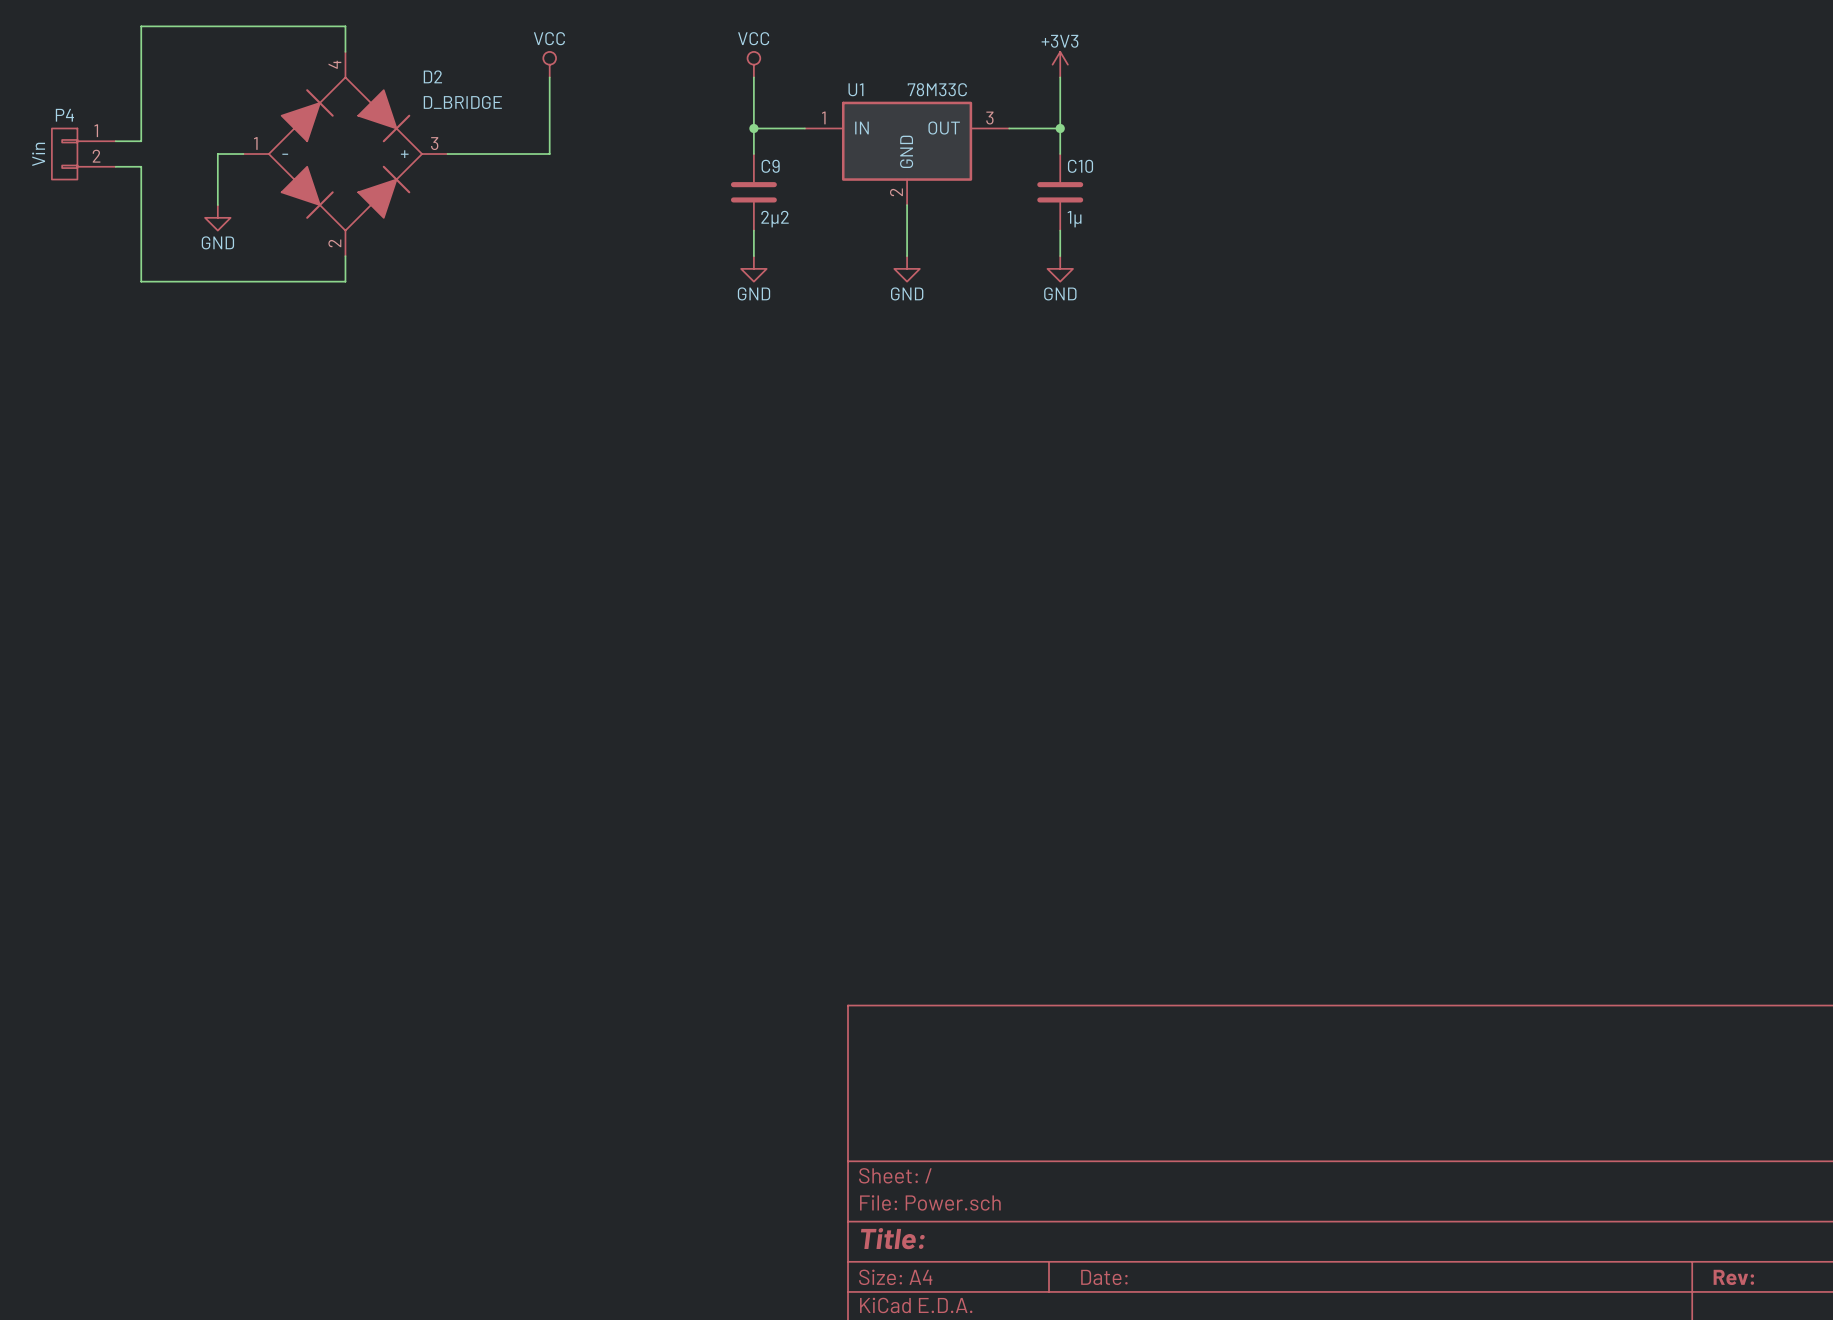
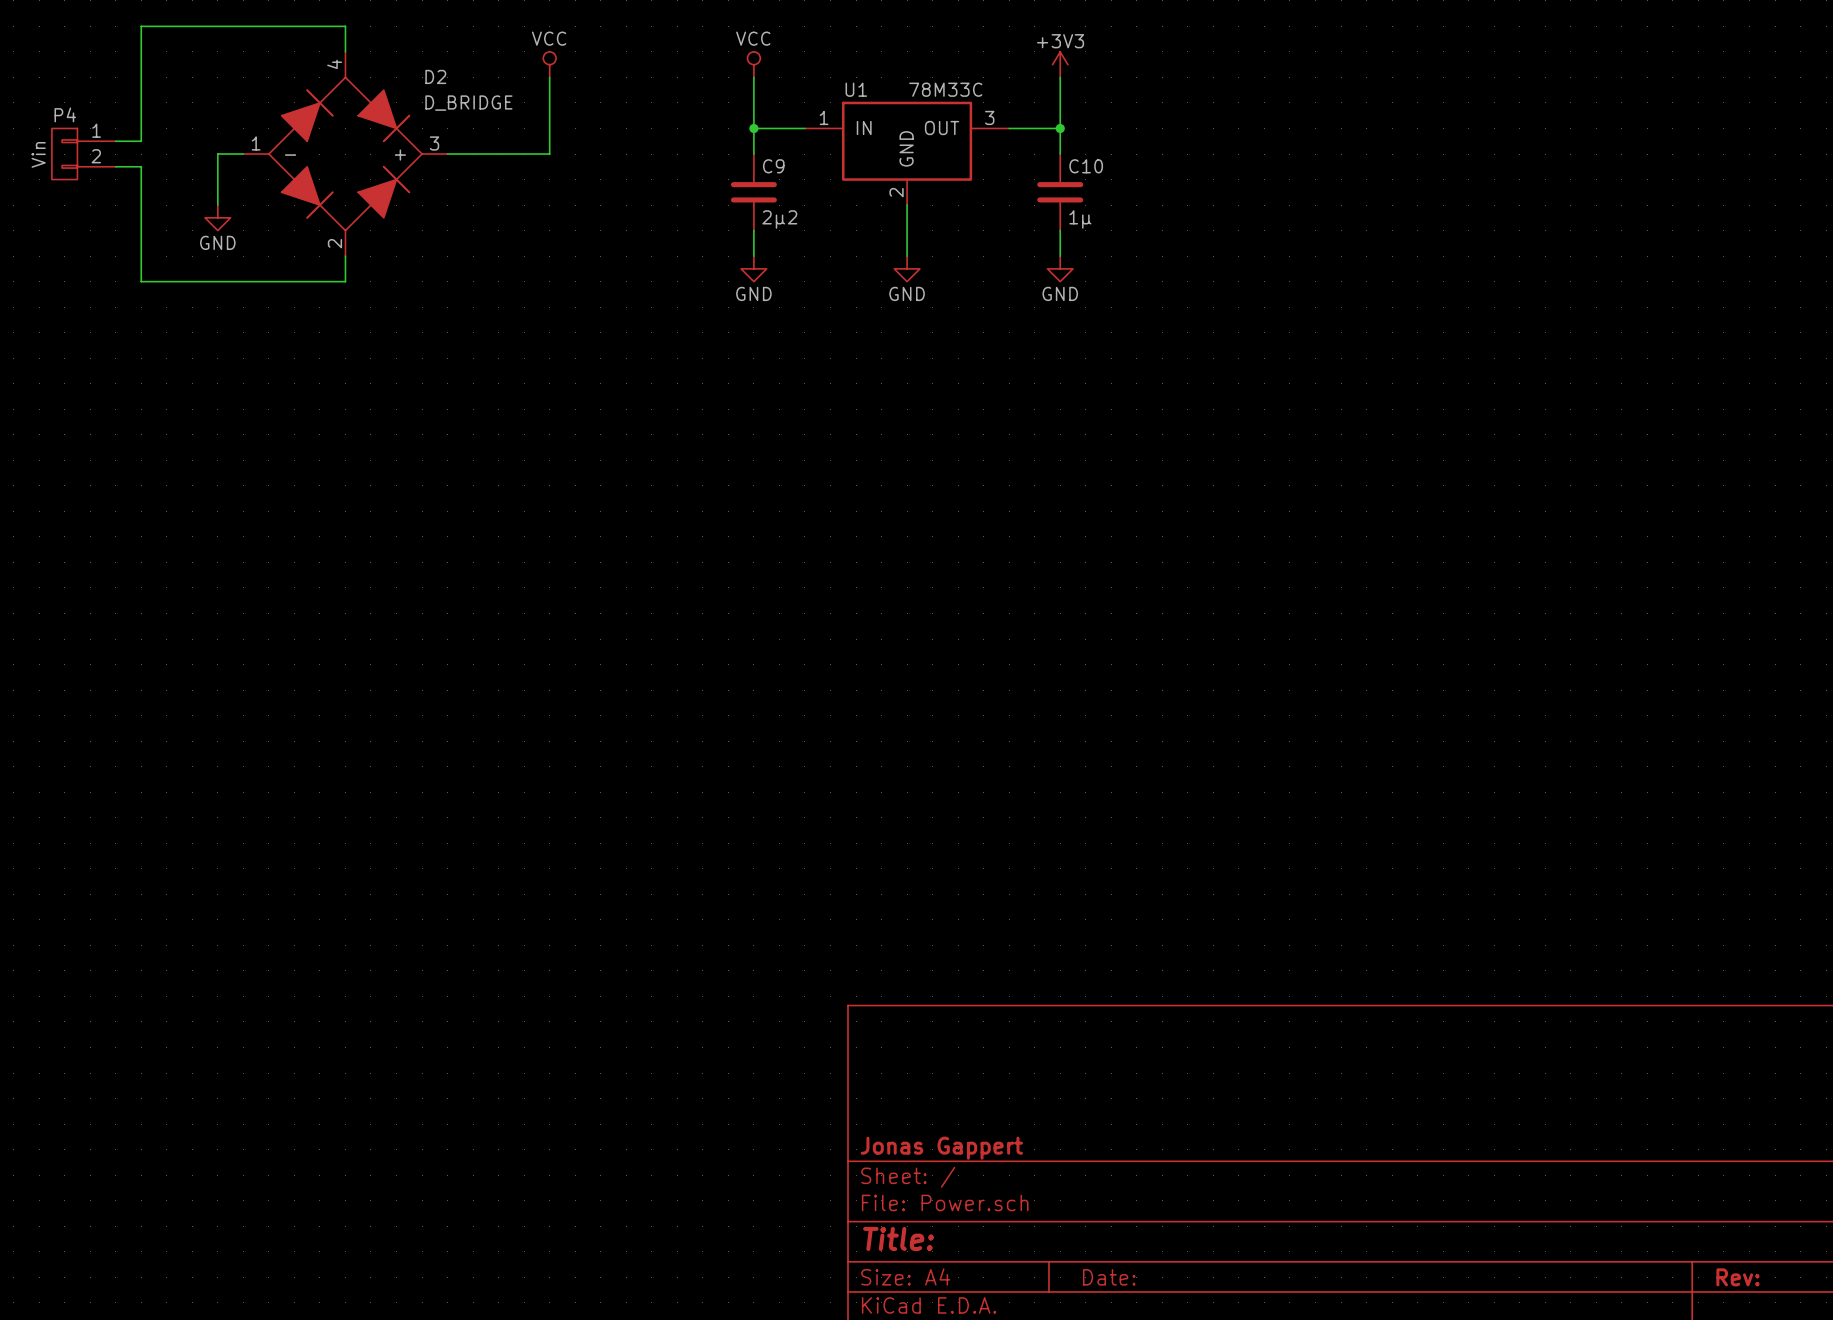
title block: none -> Jonas Gappert (941, 1148)

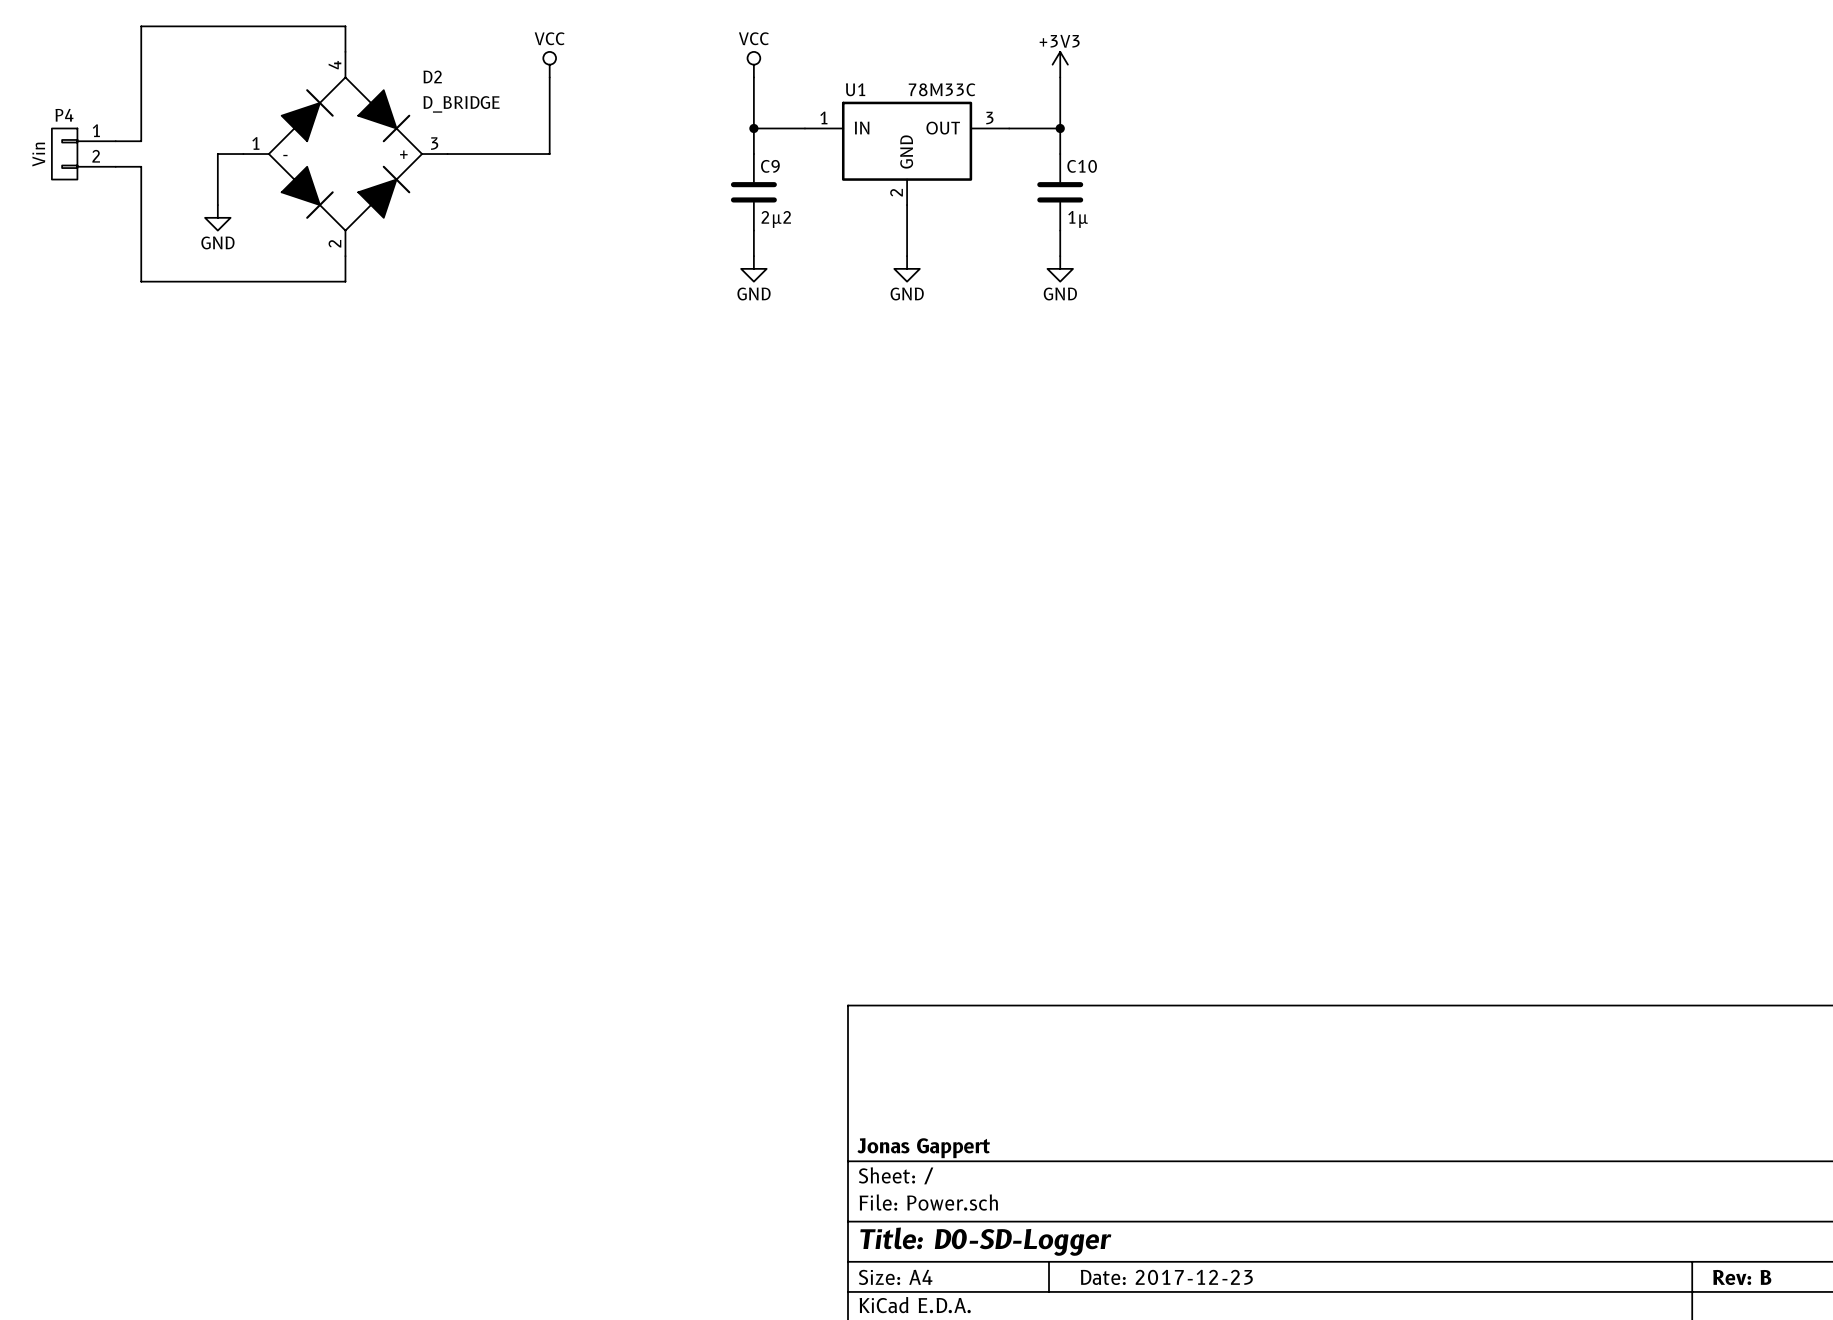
title block: Title: (898, 1238) -> Title: D0-SD-Logger (985, 1241)
title block: Date: (1109, 1277) -> Date: 2017-12-23 (1166, 1277)
title block: Rev: (1737, 1277) -> Rev: B (1742, 1277)

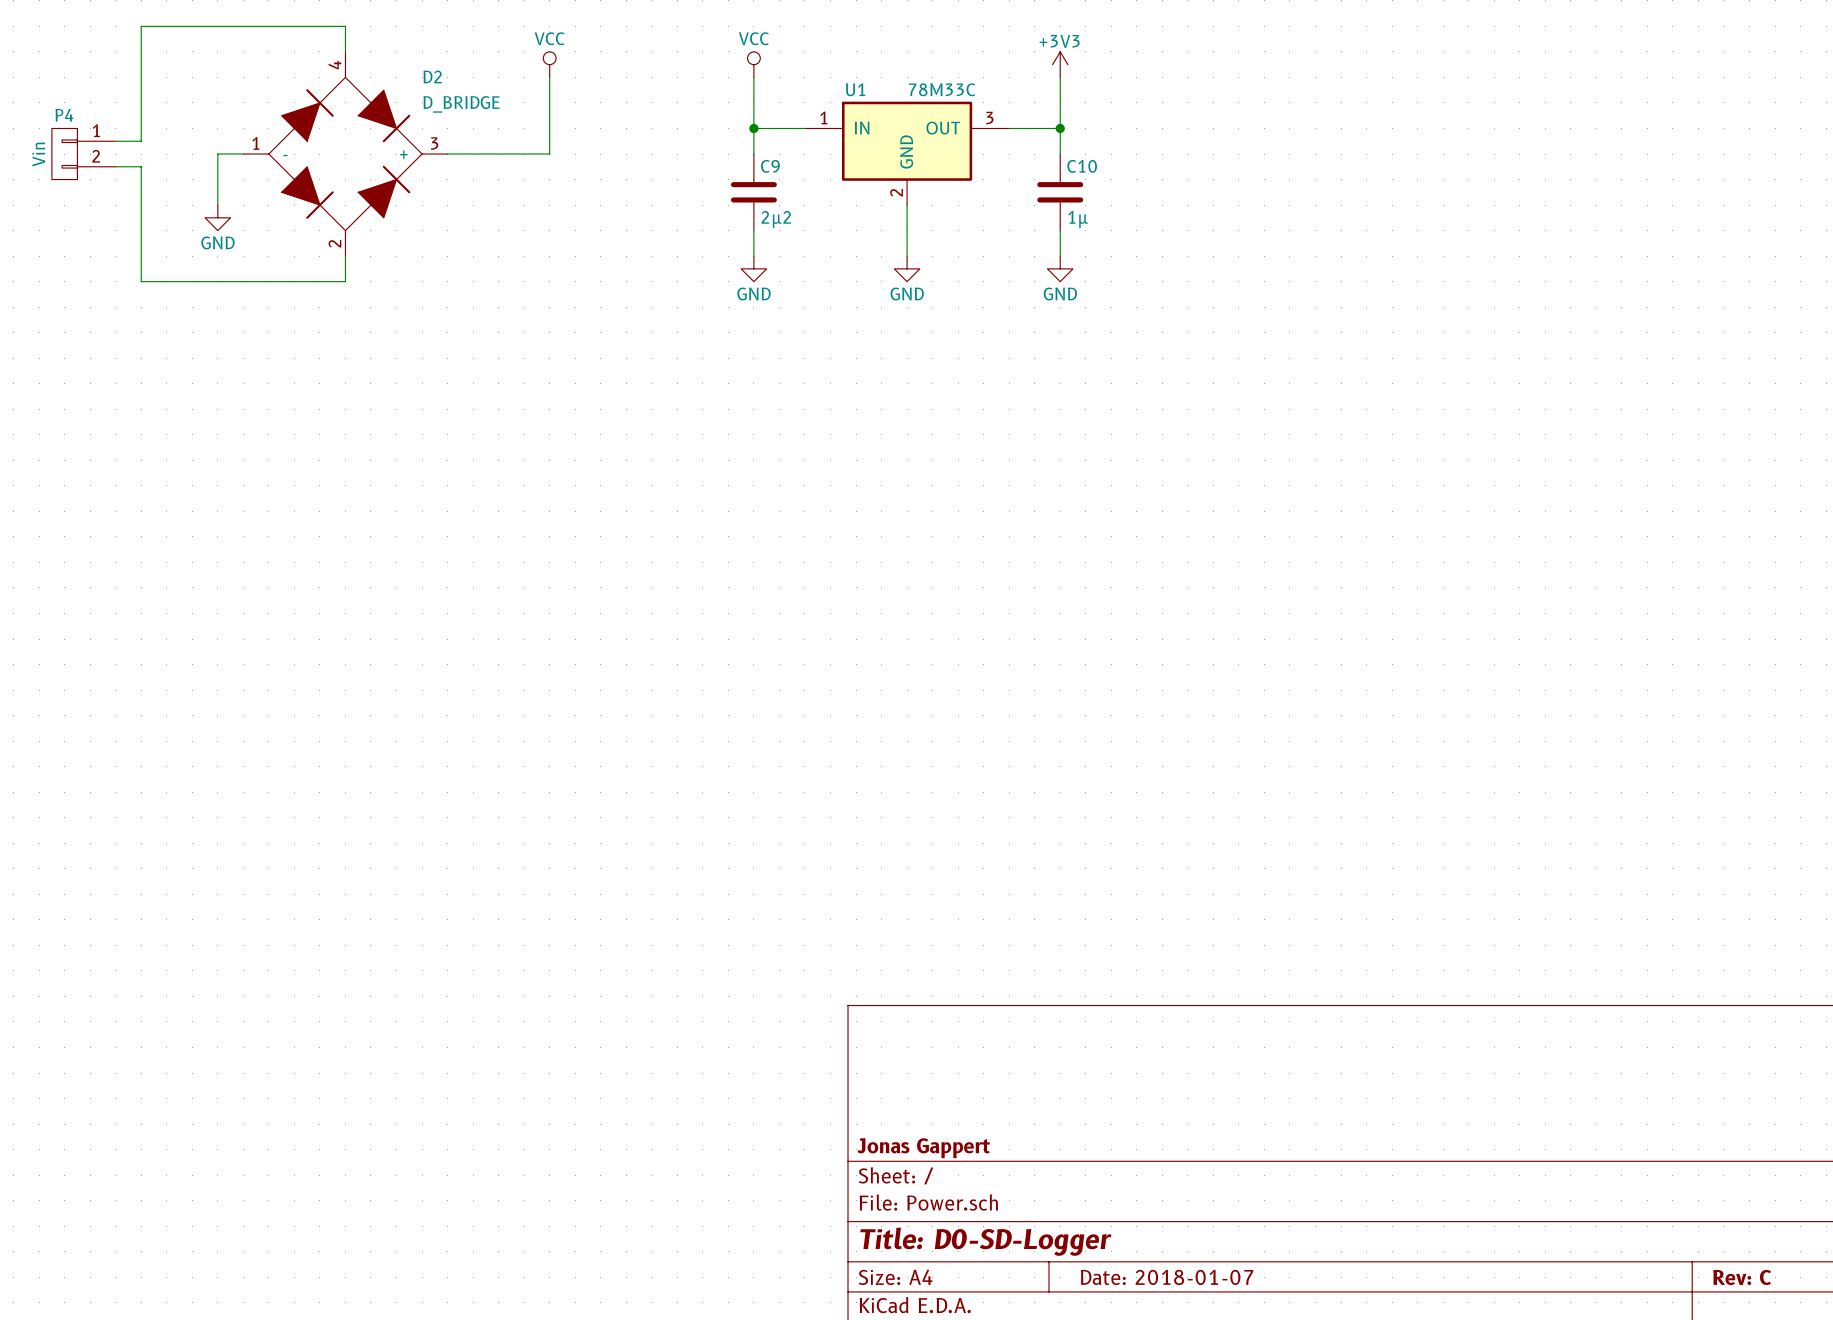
title block: Date: 2017-12-23 (1166, 1277) -> Date: 2018-01-07 (1167, 1277)
title block: Rev: B (1742, 1277) -> Rev: C (1742, 1277)

